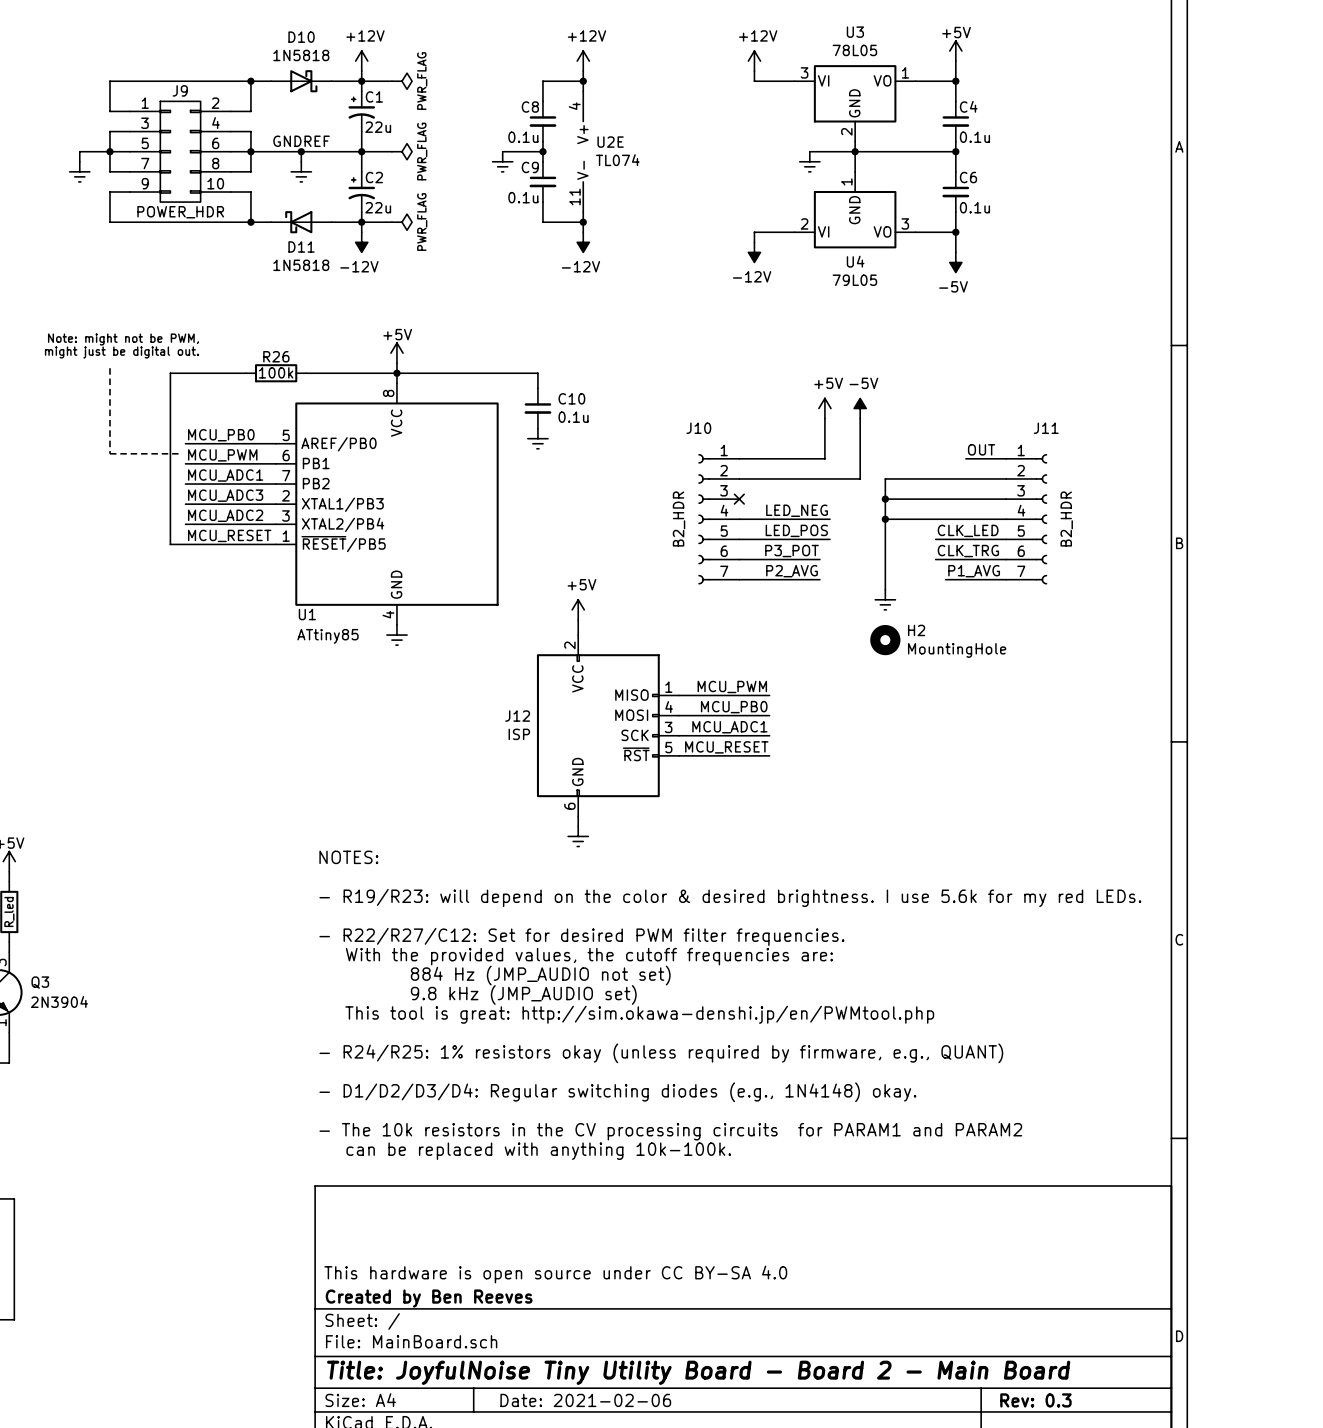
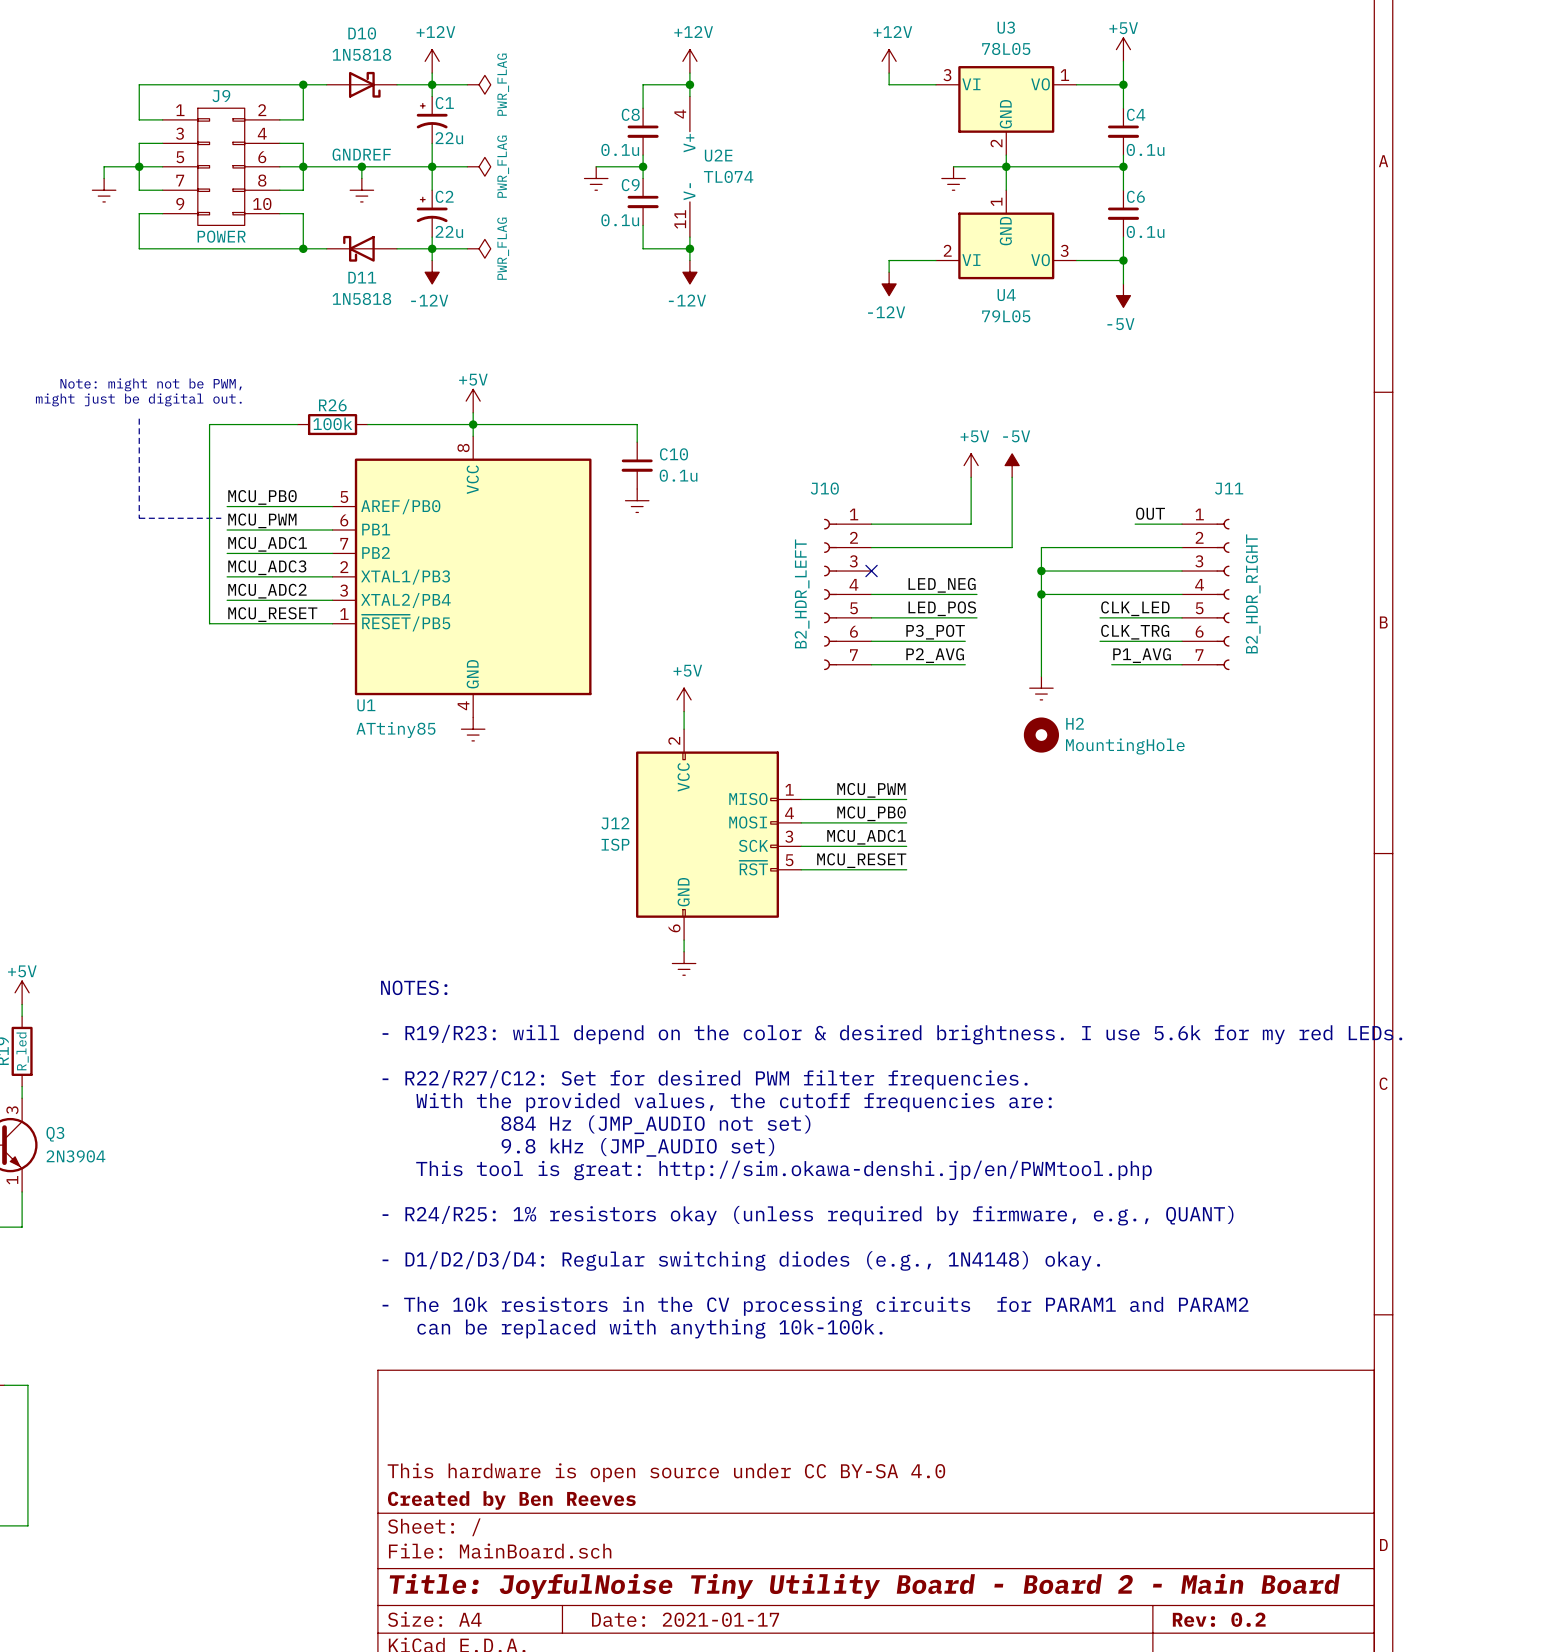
J9 value: POWER_HDR (180, 212) -> POWER (221, 236)
J10 value: B2_HDR (679, 519) -> B2_HDR_LEFT (802, 593)
J11 value: B2_HDR (1066, 519) -> B2_HDR_RIGHT (1253, 593)
title block: Date: 2021-02-06 (585, 1400) -> Date: 2021-01-17 (685, 1619)
title block: Rev: 0.3 (1035, 1400) -> Rev: 0.2 (1219, 1619)

